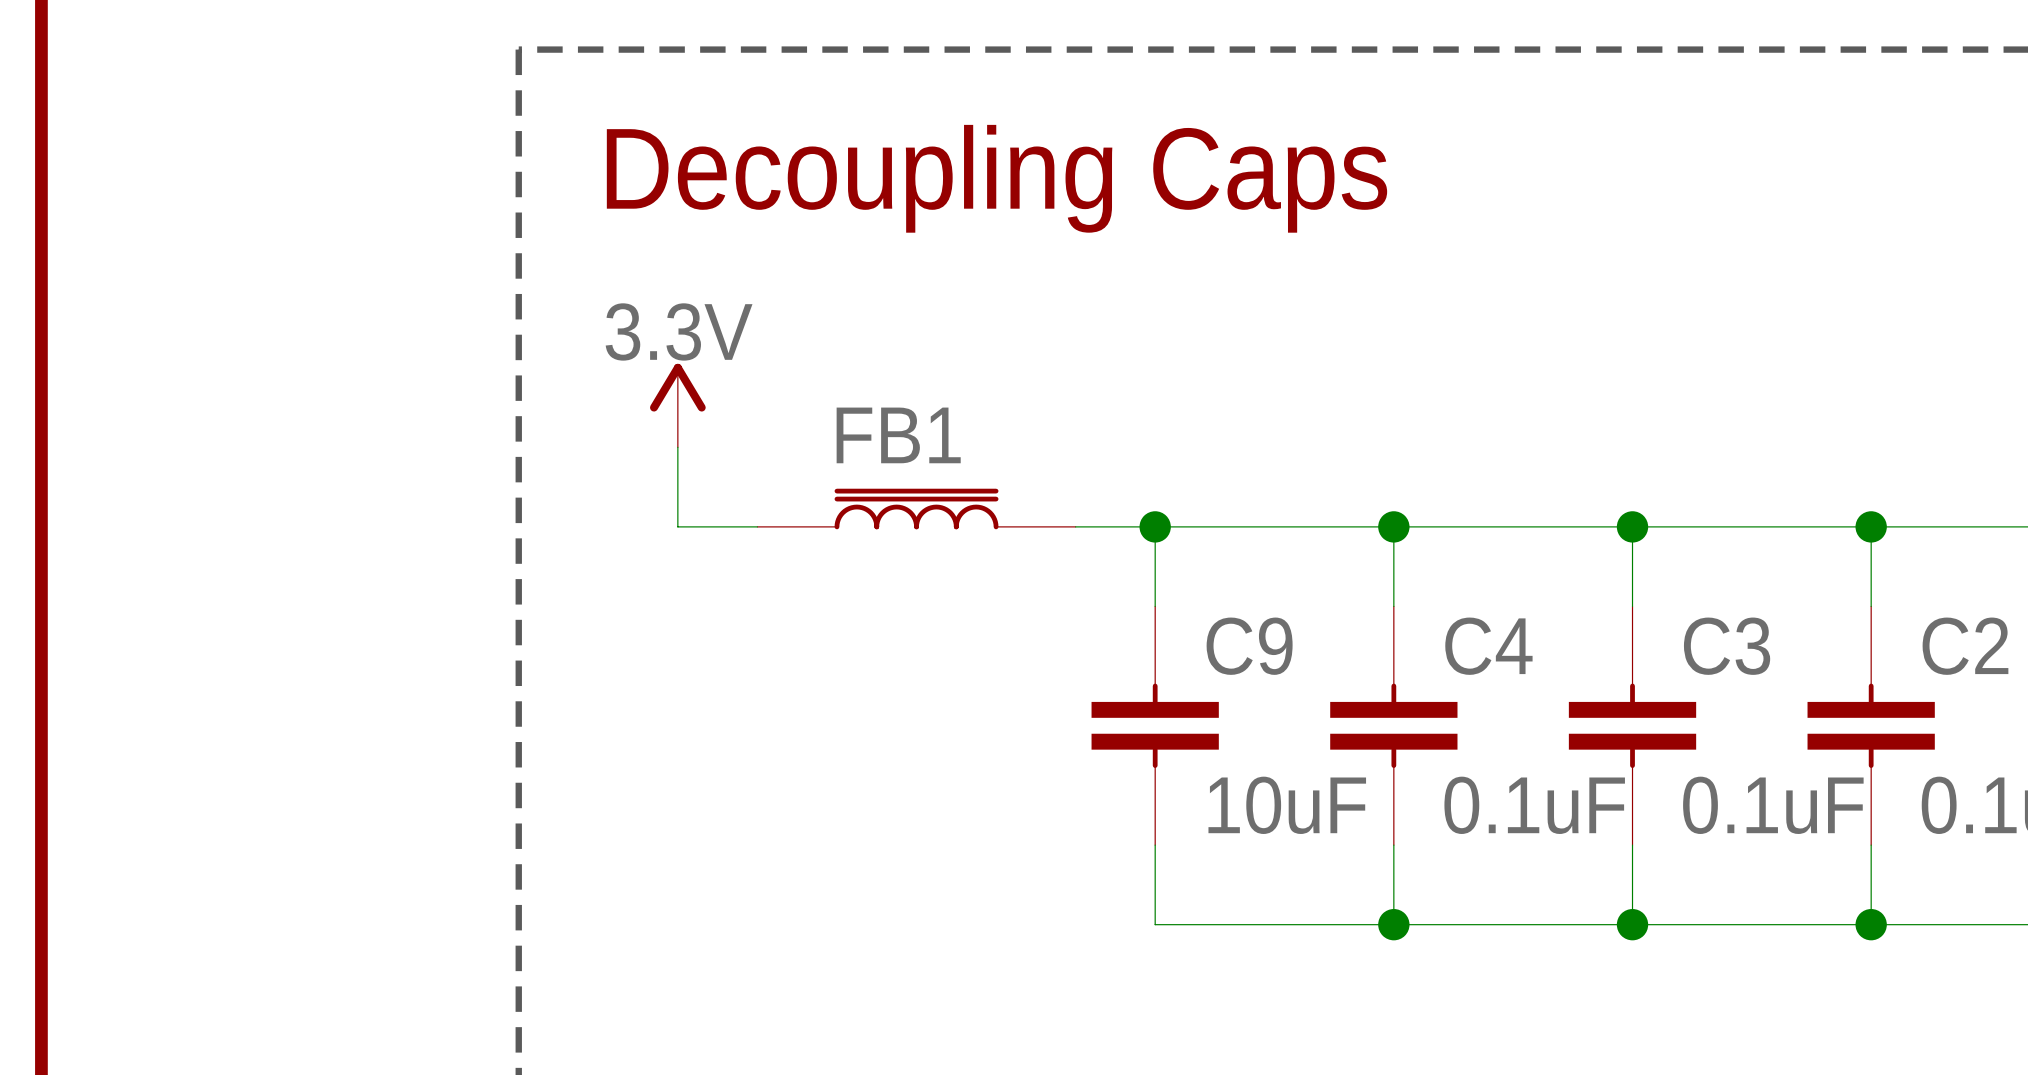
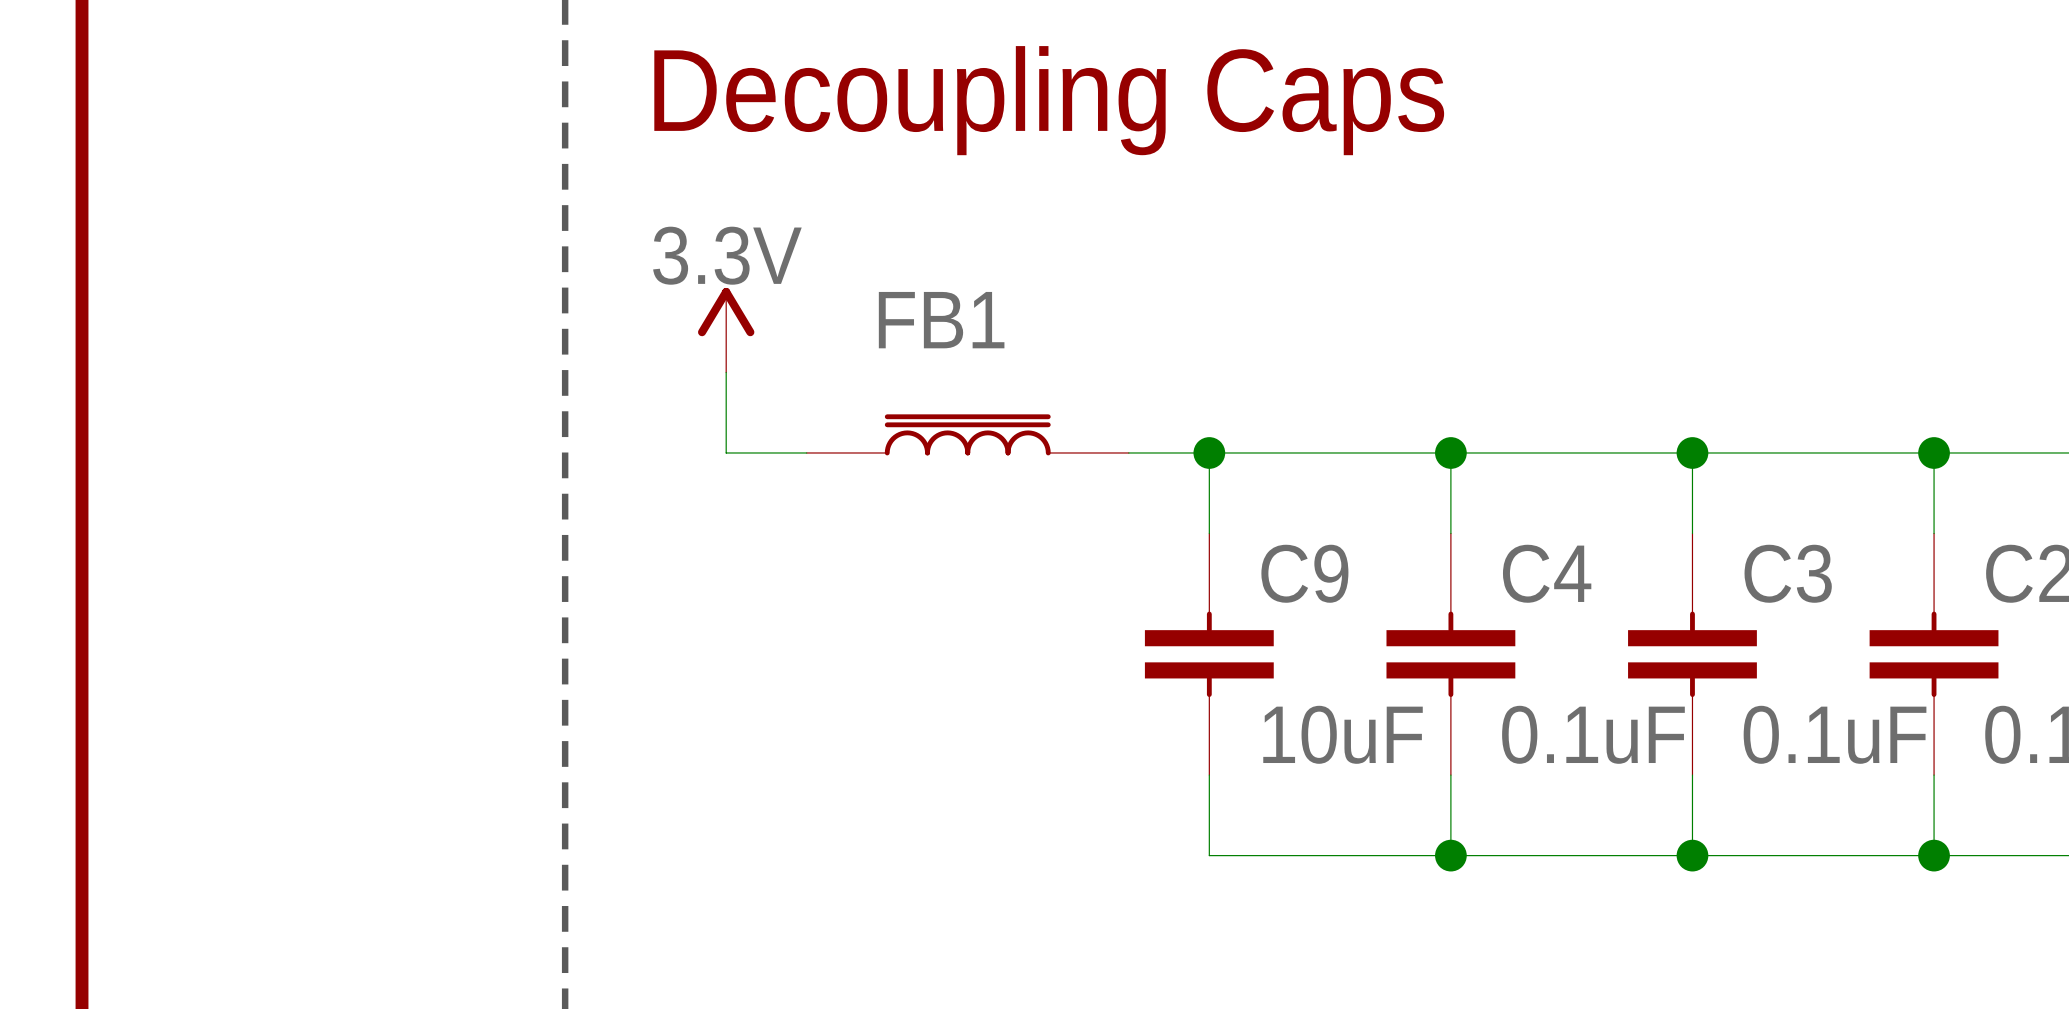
FB1 name position: FB1 (898, 435) -> FB1 (941, 320)

